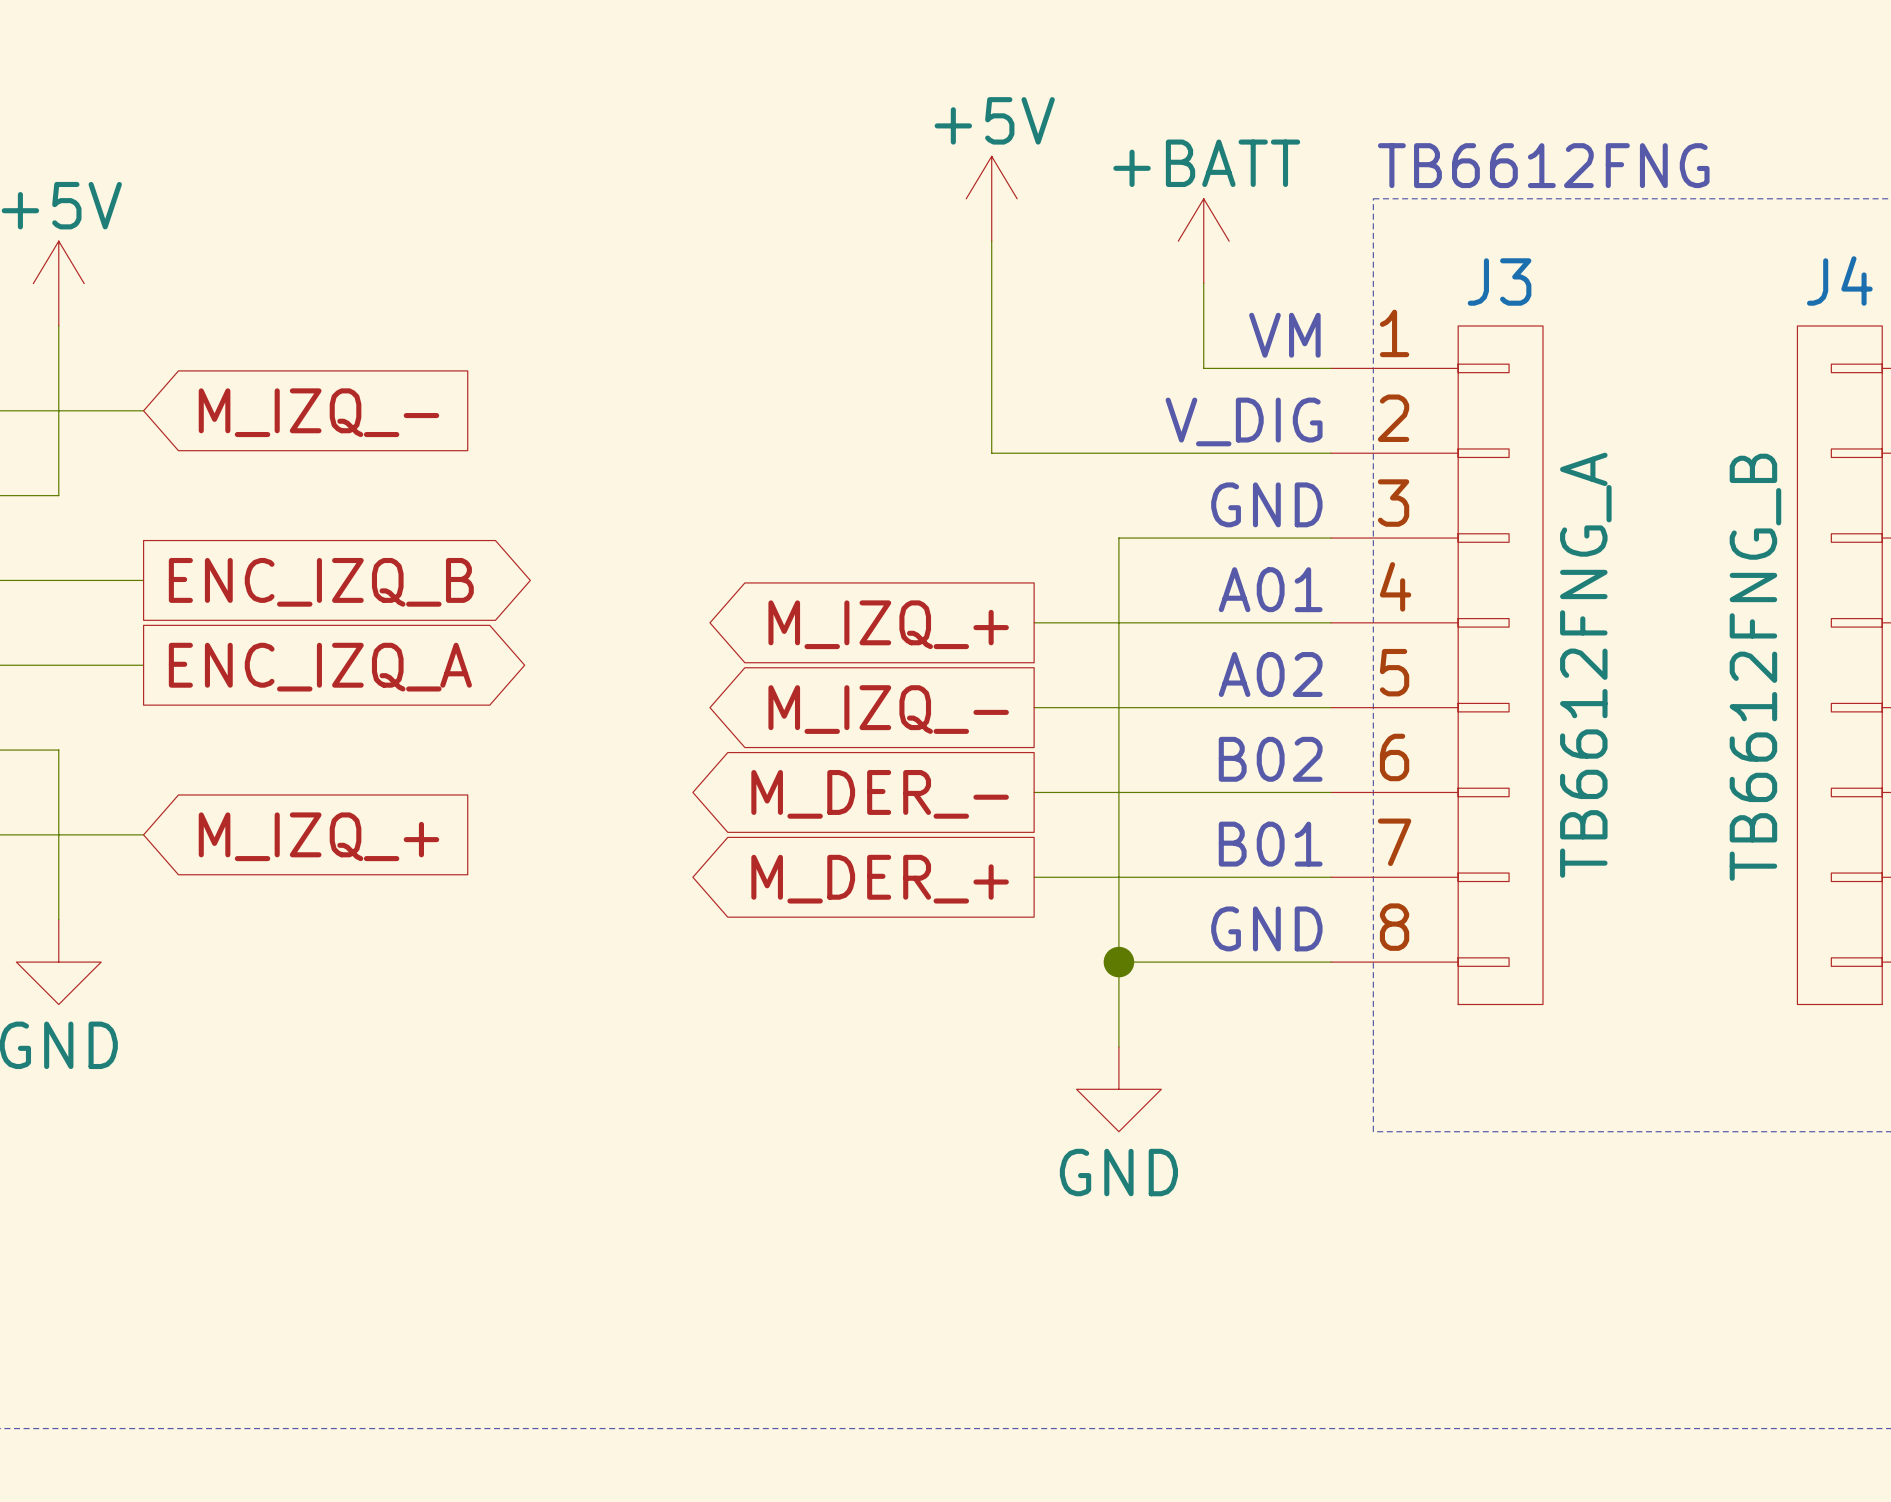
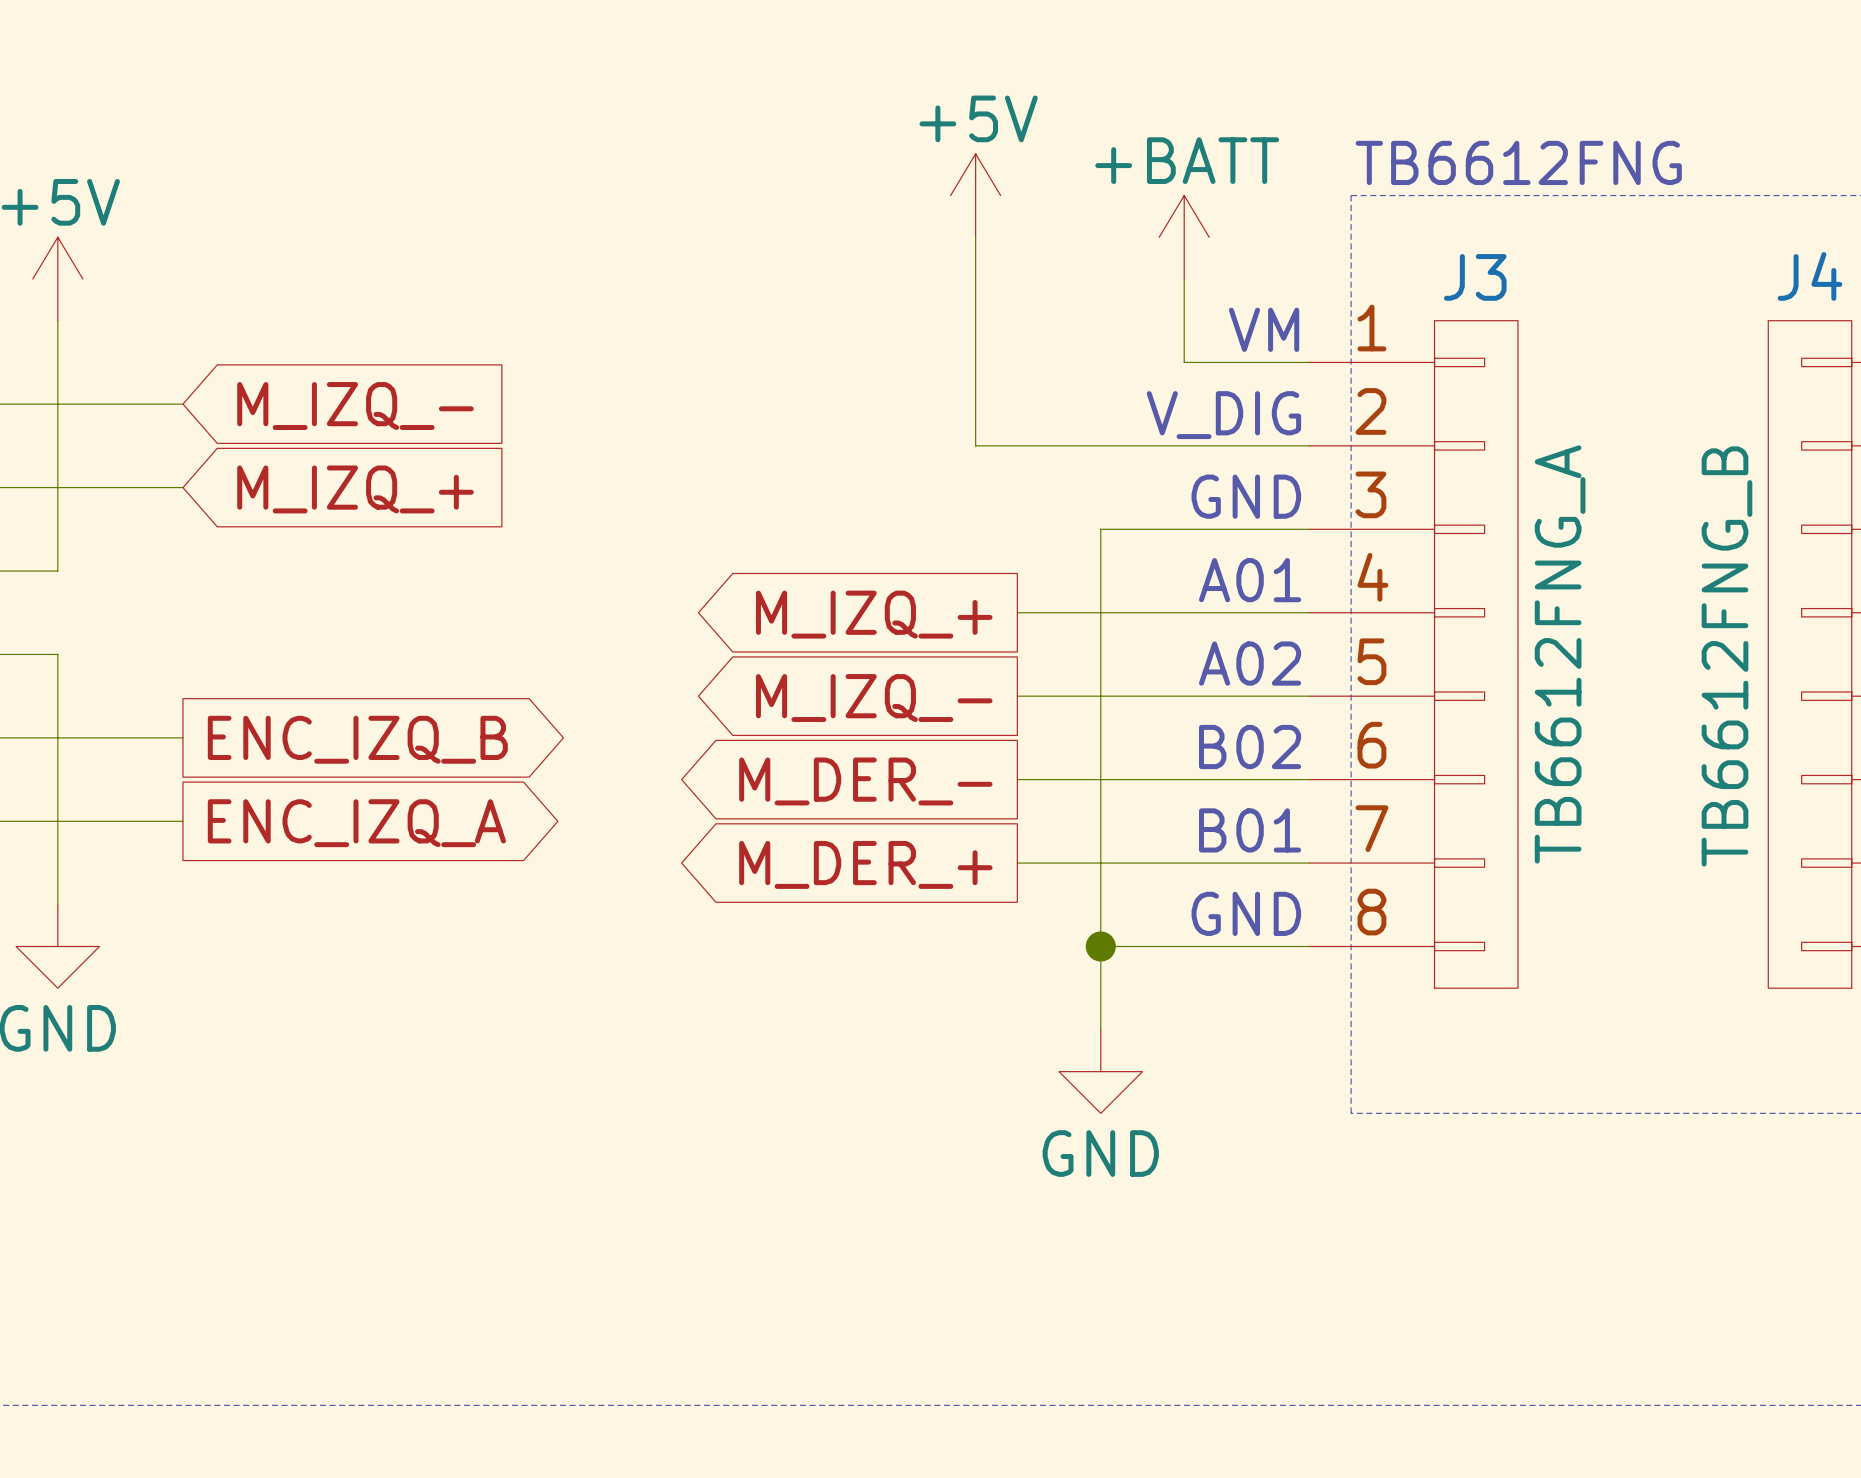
wire: none -> (141, 404) (182, 404)
global label position: M_IZQ_- (318, 412) -> M_IZQ_- (355, 406)
wire: (58, 580) (143, 580) -> (57, 571) (57, 487) (182, 487)
global label position: ENC_IZQ_B (321, 582) -> ENC_IZQ_B (357, 739)
wire: (58, 665) (143, 665) -> (57, 654) (57, 737) (182, 737)
global label position: ENC_IZQ_A (320, 667) -> ENC_IZQ_A (356, 823)
wire: none -> (141, 821) (182, 821)
global label position: M_IZQ_+ (318, 836) -> M_IZQ_+ (355, 489)

